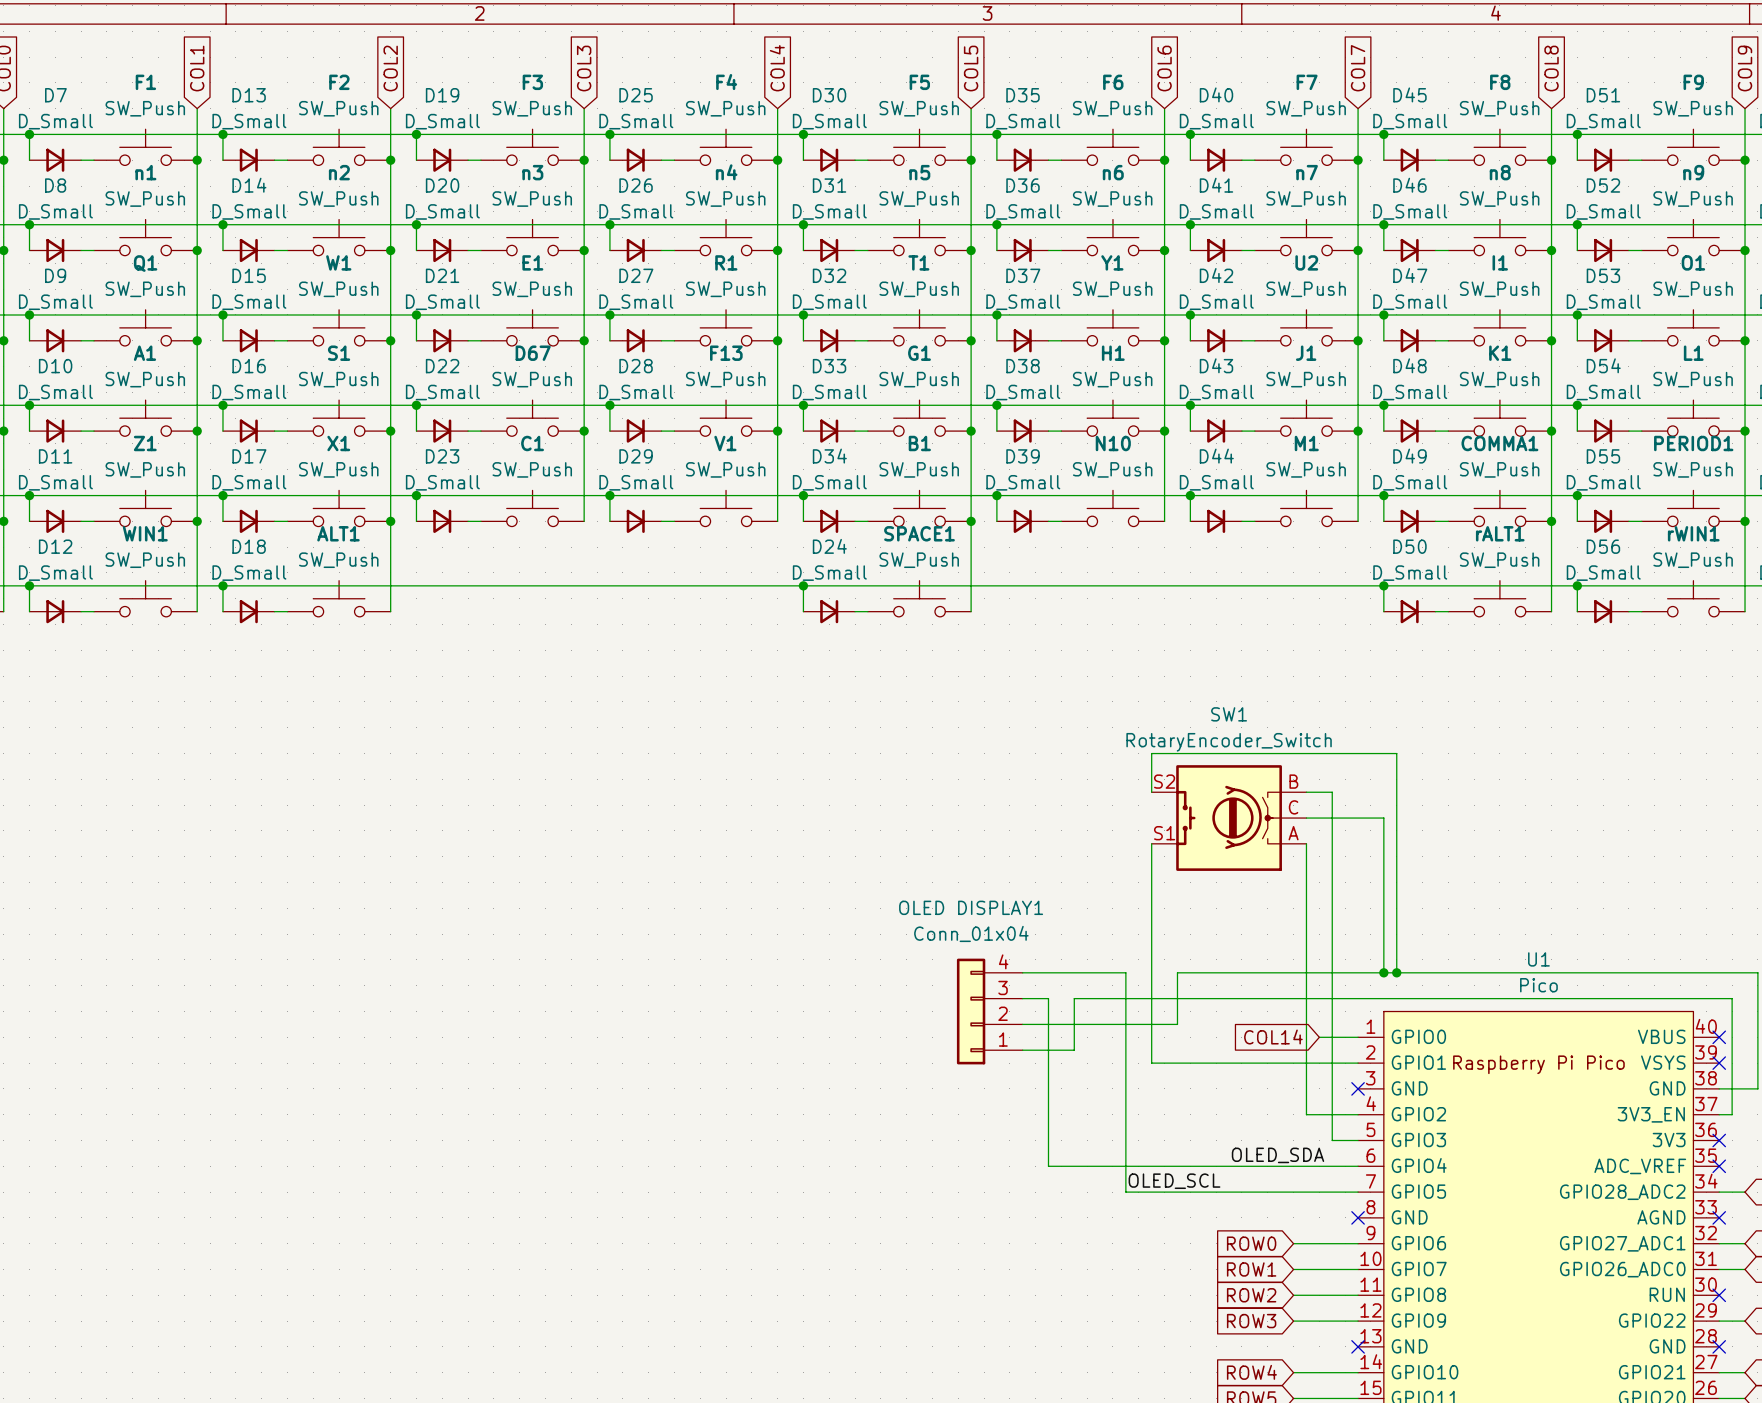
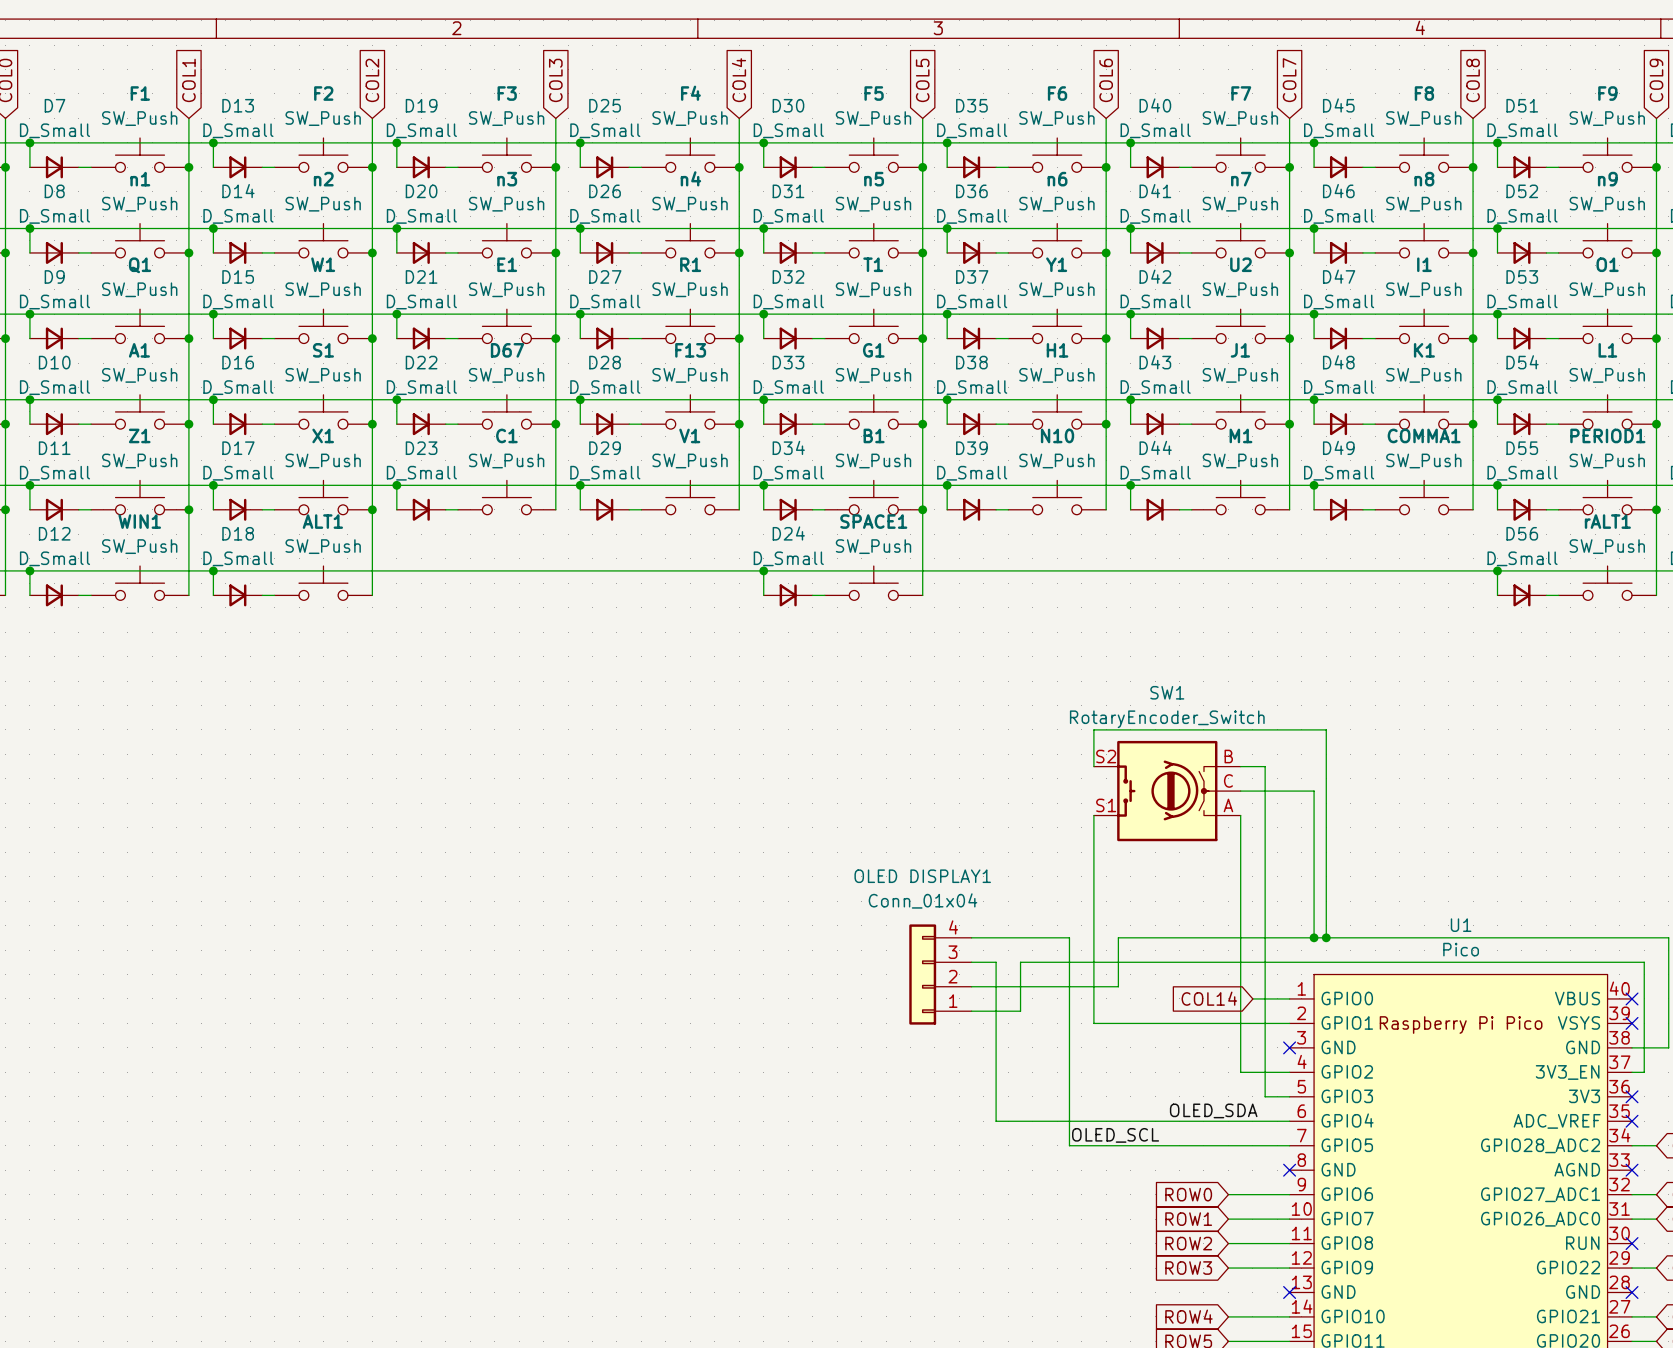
wire: (1551, 521) (1551, 611) -> none
junction: (1551, 521) -> none
rWIN1 name: rWIN1 (1693, 533) -> rALT1 (1607, 521)
wire: (1383, 585) (1383, 611) -> none
junction: (1383, 585) -> none
rALT1: SW_Push (1499, 598) -> none
D50: D_Small (1409, 611) -> none
wire: (1435, 611) (1448, 611) -> none

